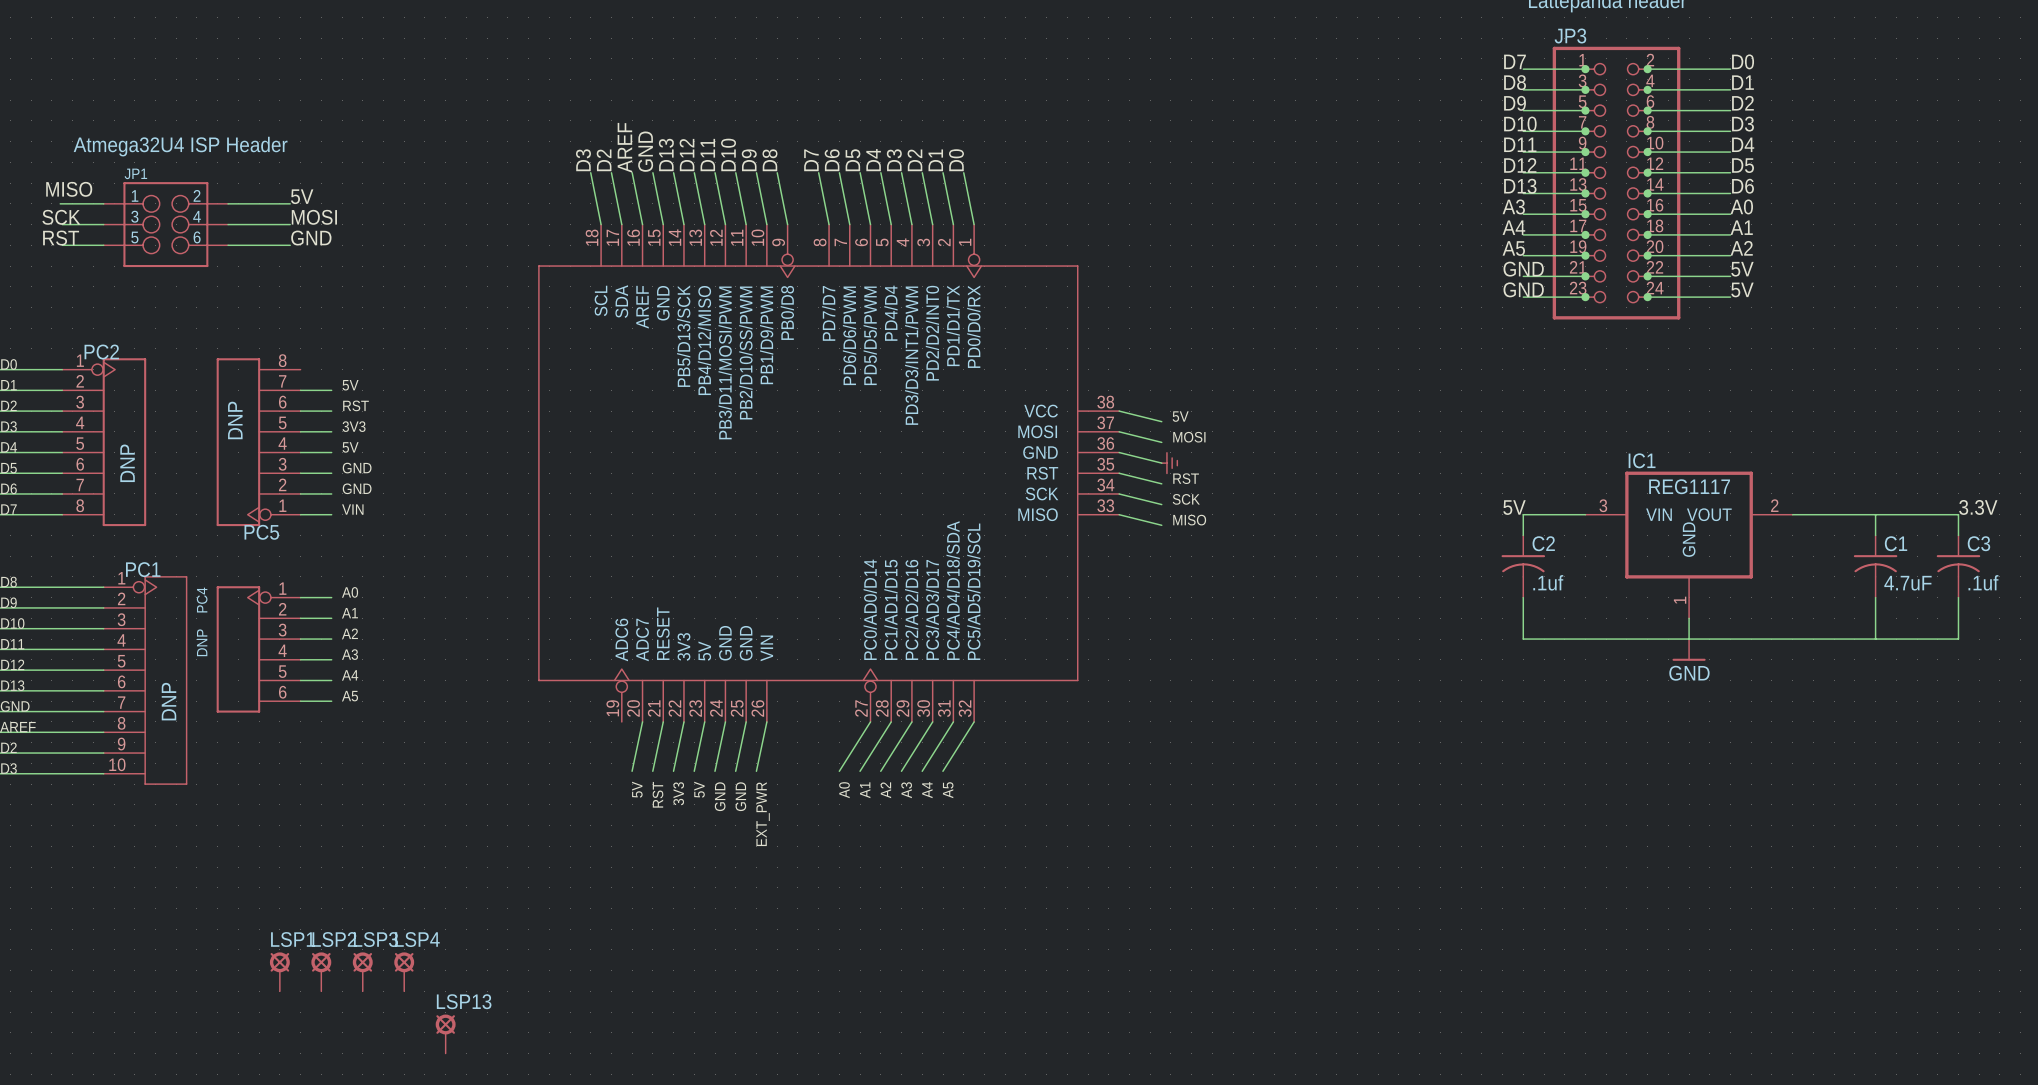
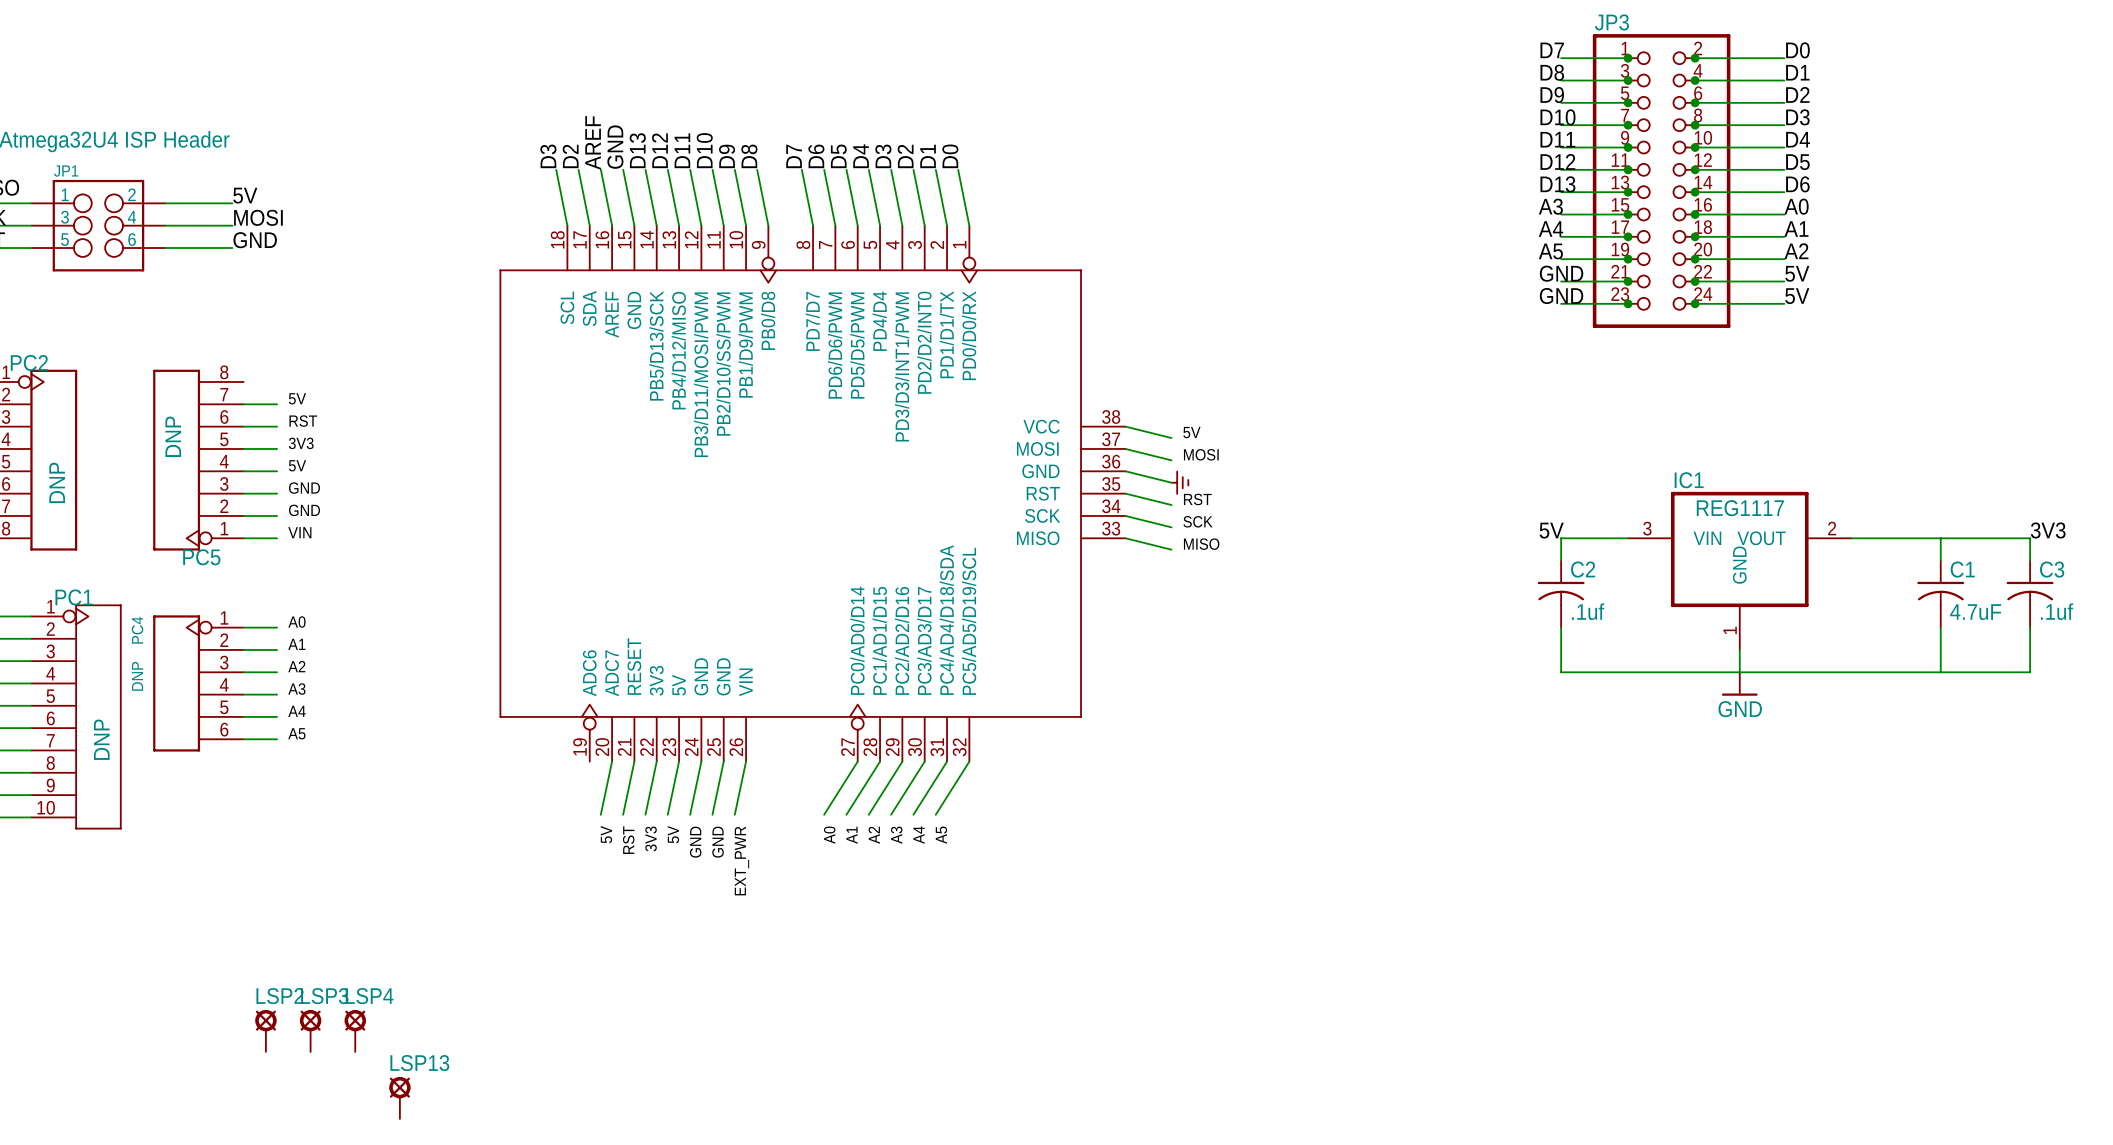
label: 3.3V (1978, 507) -> 3V3 (2048, 530)
LSP1: (279, 971) -> none

